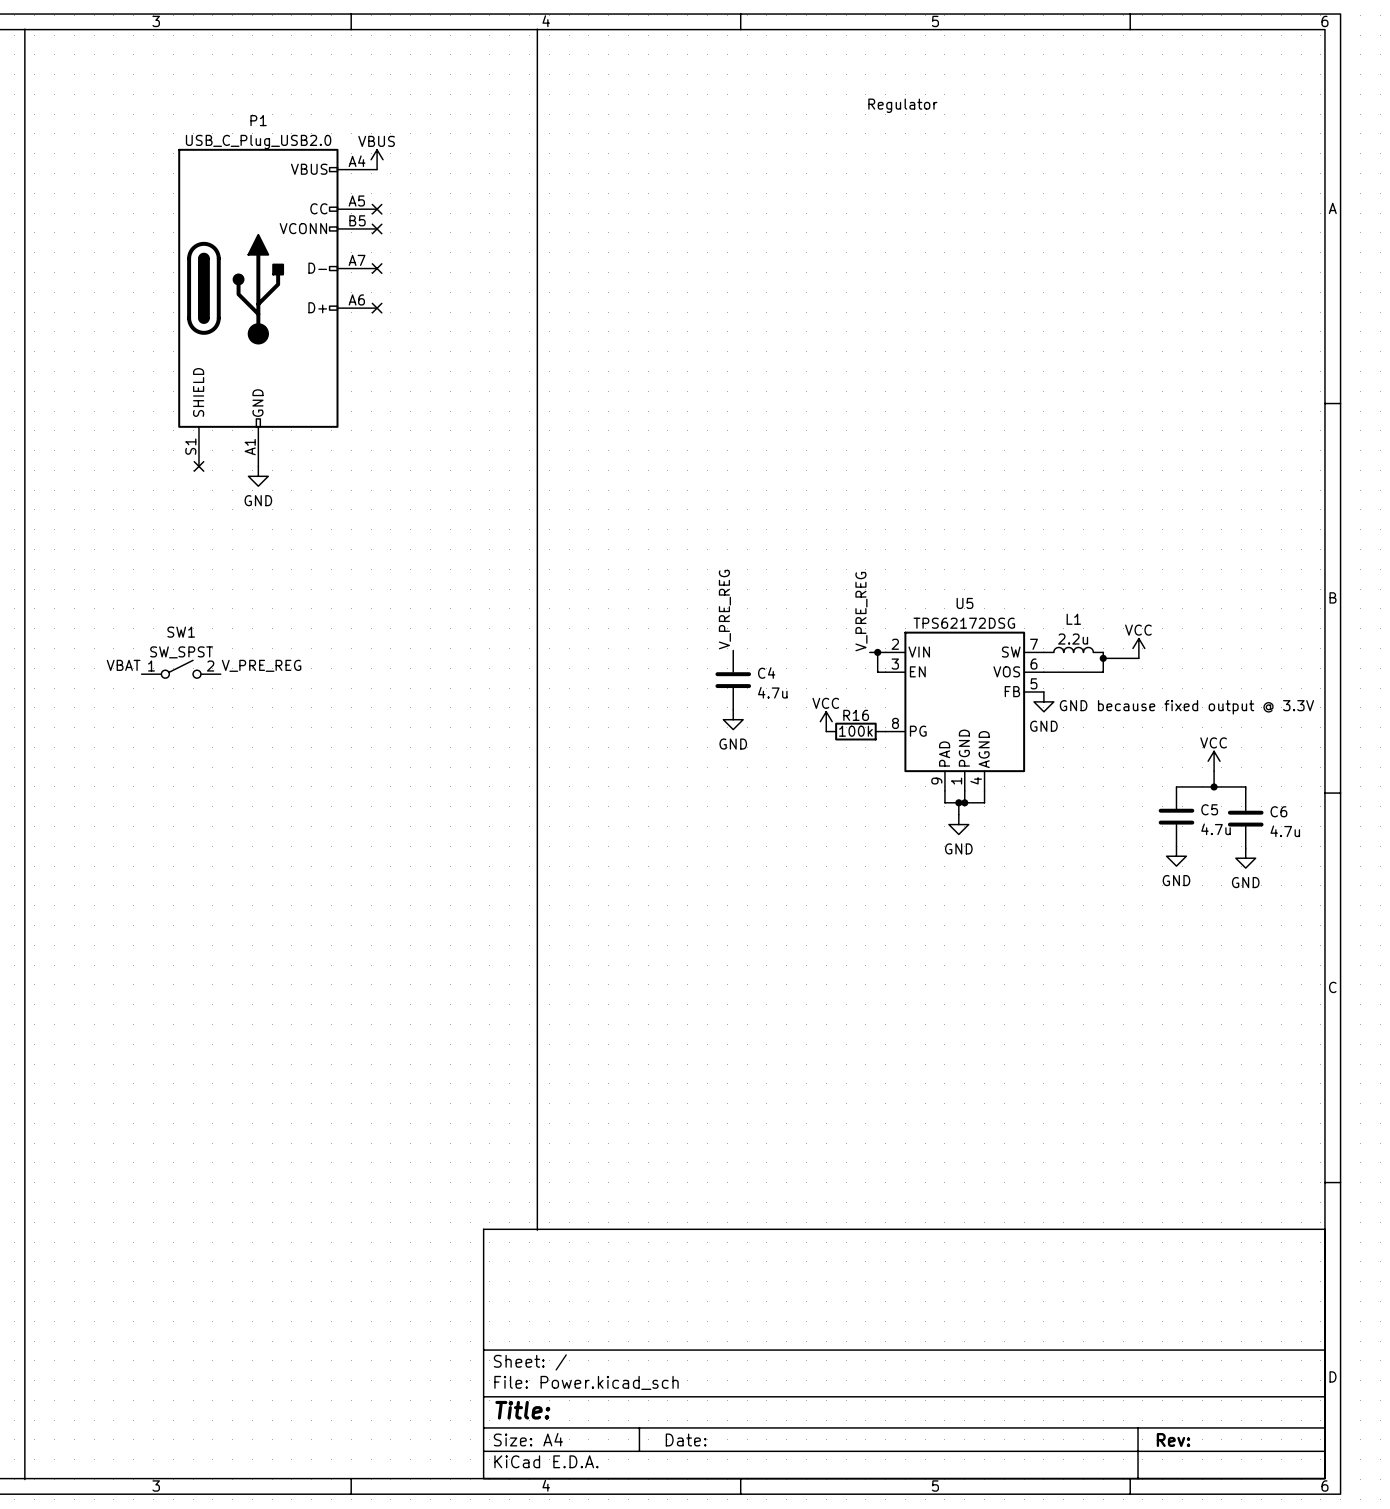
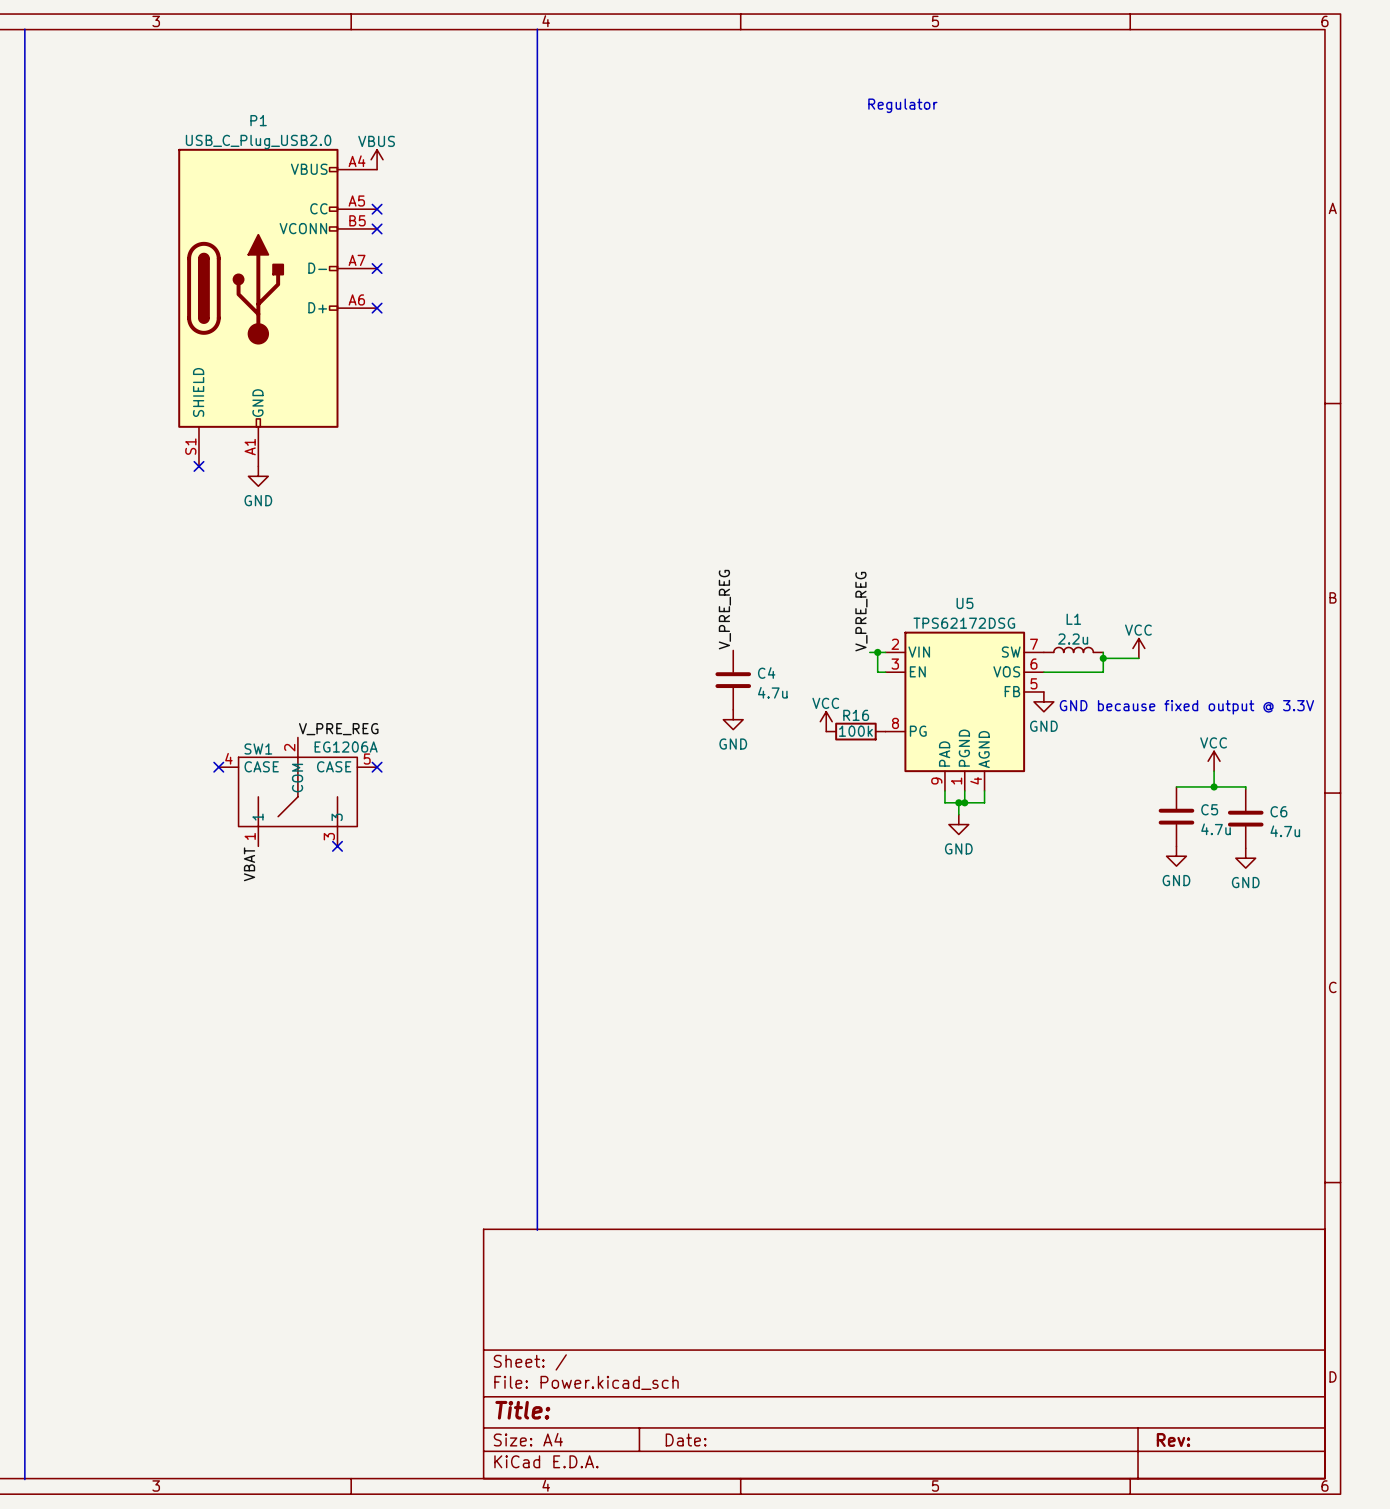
SW1 name position: SW1 (181, 632) -> SW1 (258, 749)
SW1 value: SW_SPST (181, 652) -> EG1206A (346, 747)
SW1 symbol: [141, 660, 221, 679] -> [218, 737, 378, 847]
label: VBAT (123, 665) -> none
label position: V_PRE_REG (261, 665) -> V_PRE_REG (338, 729)
no-connect mark: none -> (218, 767)
no-connect mark: none -> (377, 767)
no-connect mark: none -> (337, 846)
label: none -> VBAT (249, 864)

